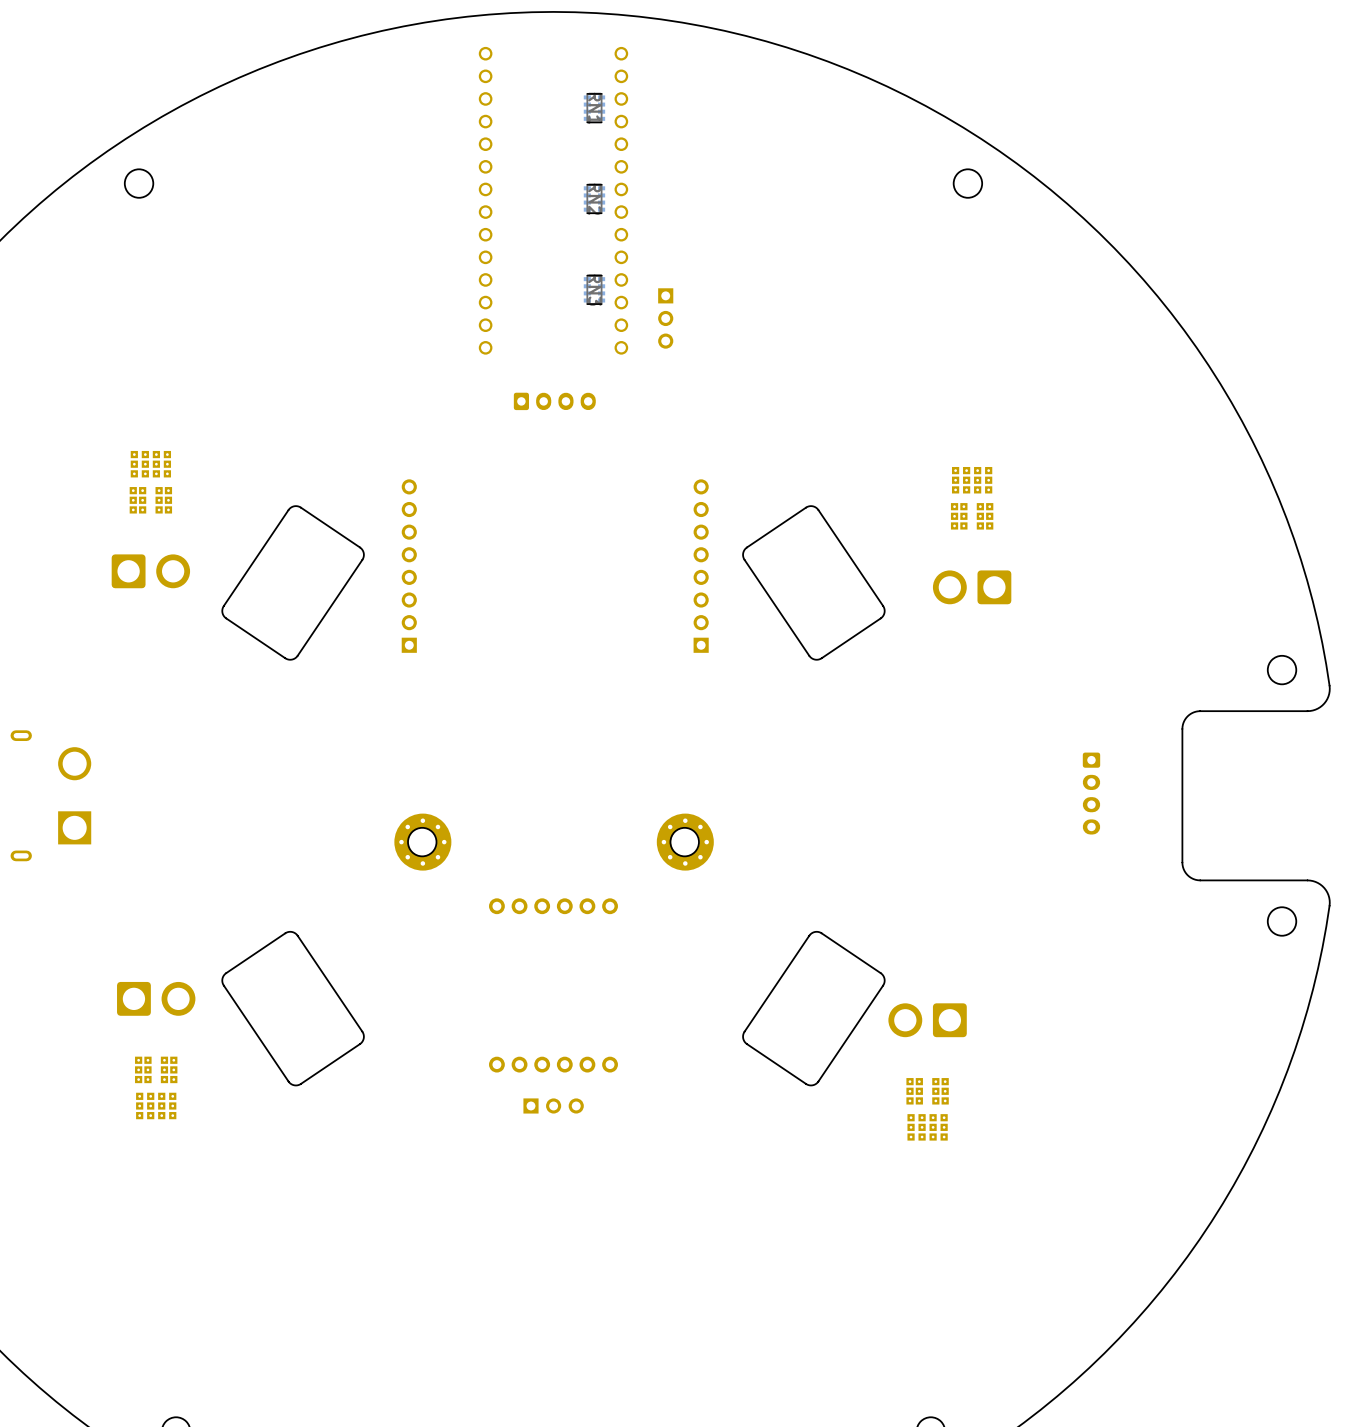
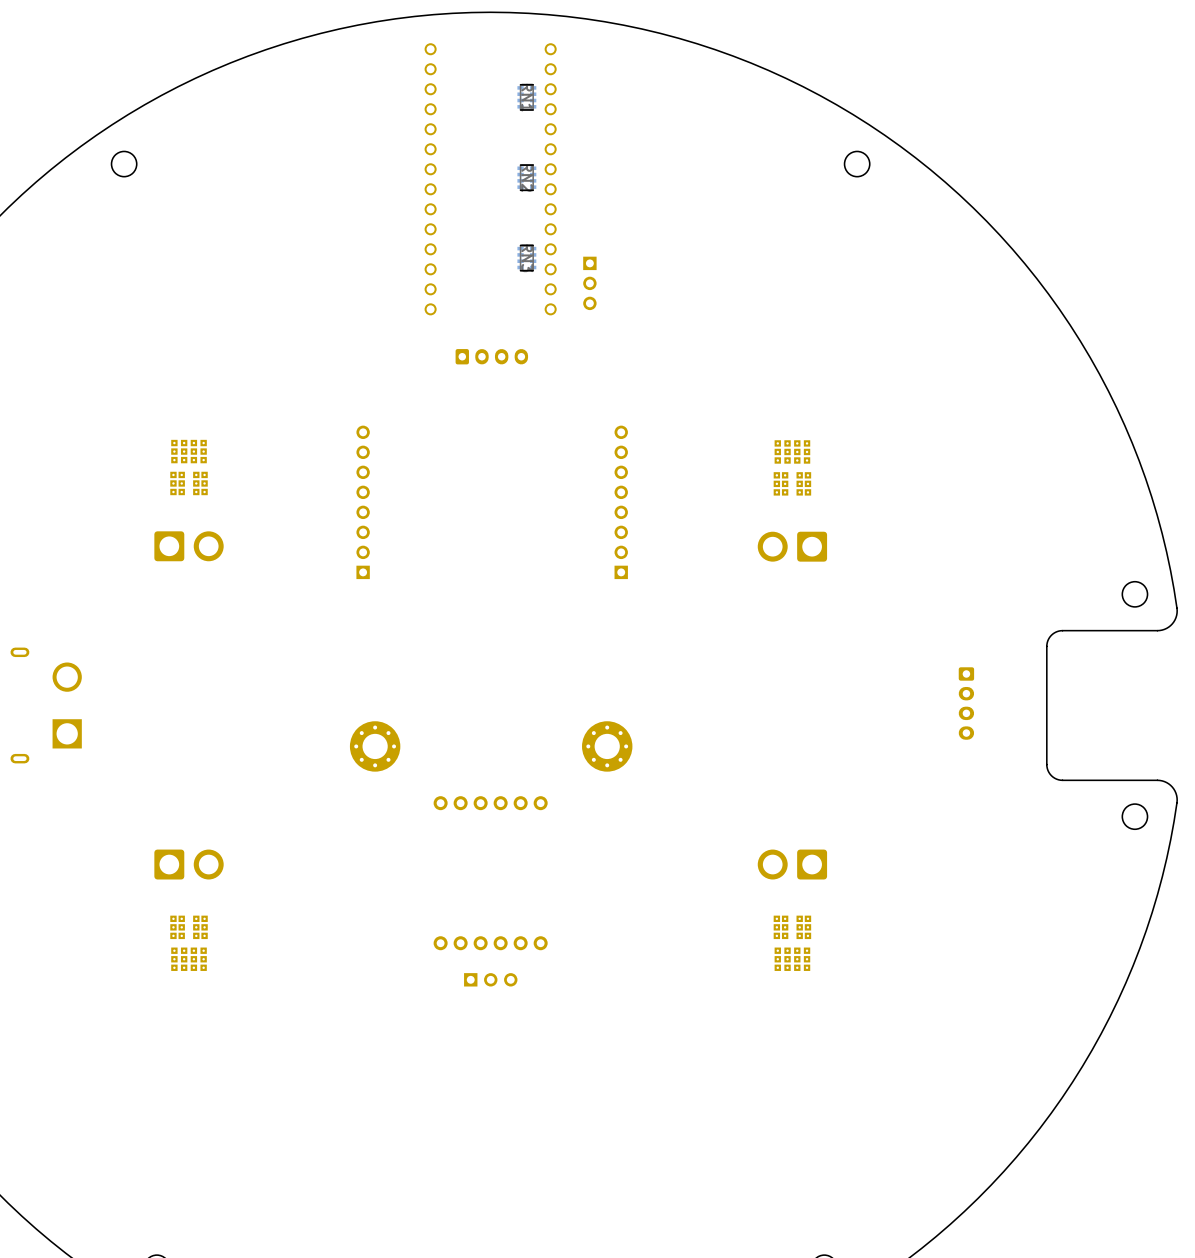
part position: (150, 482) -> (189, 467)
part position: (972, 498) -> (792, 467)
board edge: (300, 507) (360, 547) (363, 555) (297, 655) (289, 659) (226, 618) (222, 610) (289, 509) (295, 506) (300, 507) -> none
board edge: (806, 507) (746, 547) (743, 555) (809, 655) (816, 659) (880, 618) (884, 610) (817, 509) (811, 506) (806, 507) -> none
part position: (150, 571) -> (189, 546)
part position: (972, 587) -> (792, 546)
round board edge: [407, 826, 438, 858] -> none
round board edge: [669, 826, 700, 858] -> none
board edge: (285, 933) (226, 973) (222, 980) (288, 1081) (296, 1085) (360, 1044) (363, 1036) (297, 934) (290, 931) (285, 933) -> none
board edge: (821, 933) (880, 973) (884, 981) (818, 1081) (810, 1085) (746, 1044) (743, 1036) (809, 935) (815, 931) (821, 933) -> none
part position: (156, 998) -> (189, 864)
part position: (927, 1020) -> (792, 864)
part position: (156, 1087) -> (189, 943)
part position: (927, 1109) -> (792, 943)

